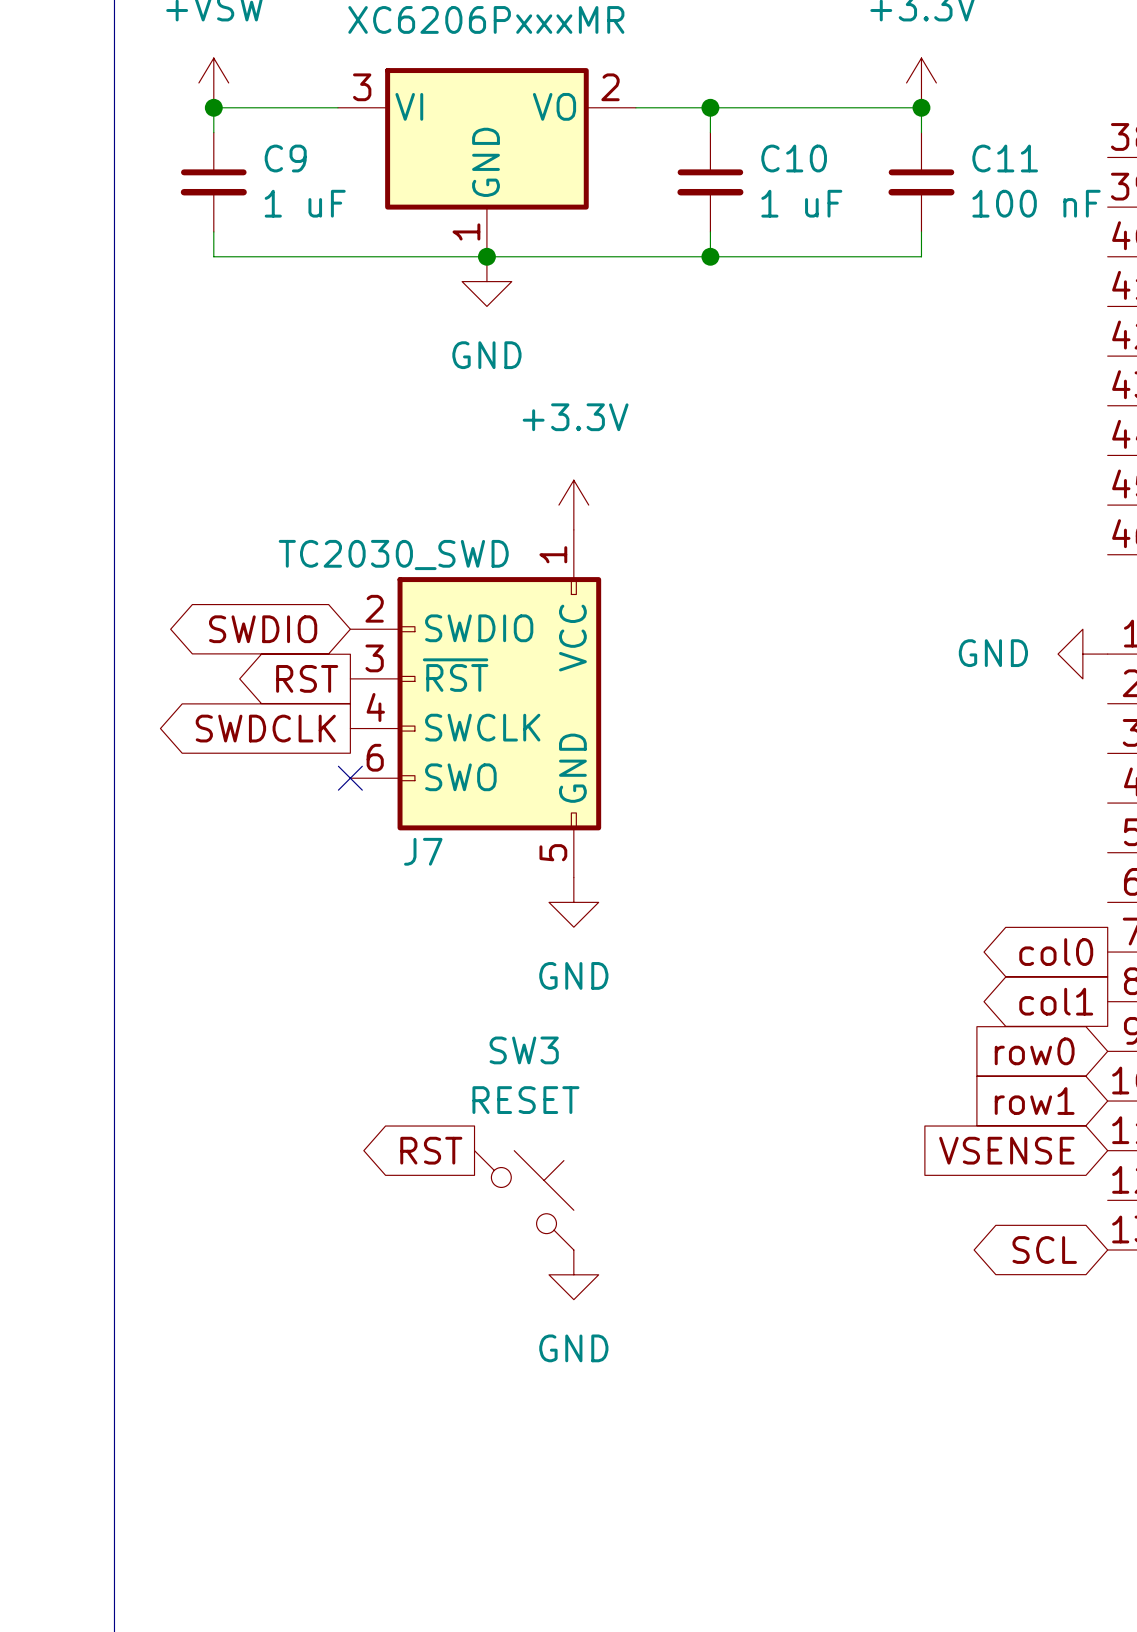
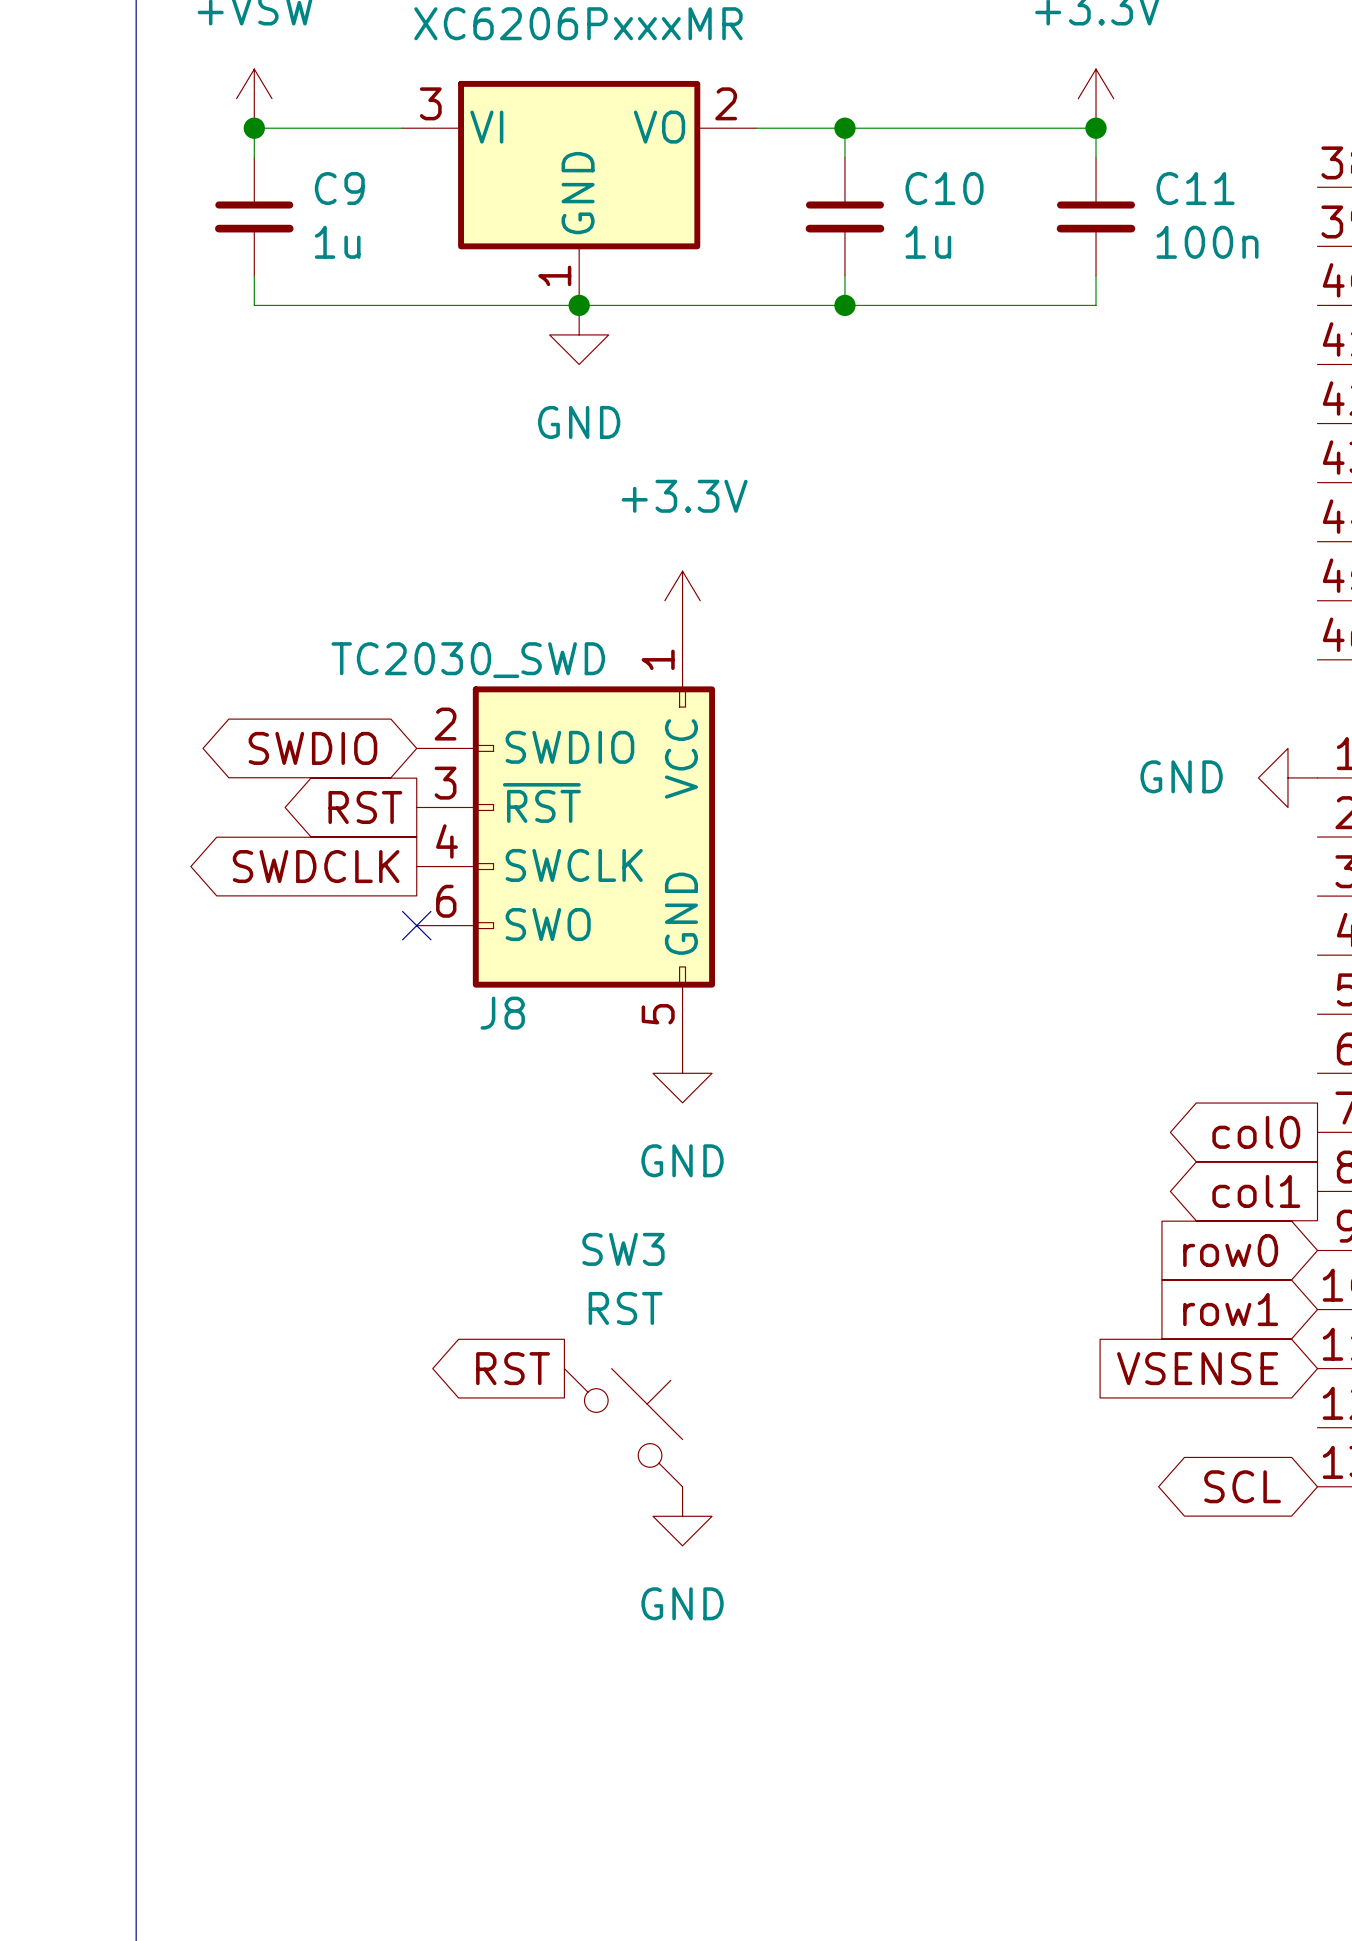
C9 value: 1 uF (305, 203) -> 1u (337, 242)
C10 value: 1 uF (801, 203) -> 1u (928, 242)
C11 value: 100 nF (1036, 203) -> 100n (1207, 242)
J7 name: J7 (423, 851) -> J8 (502, 1013)
SW3 value: RESET (525, 1100) -> RST (625, 1308)

